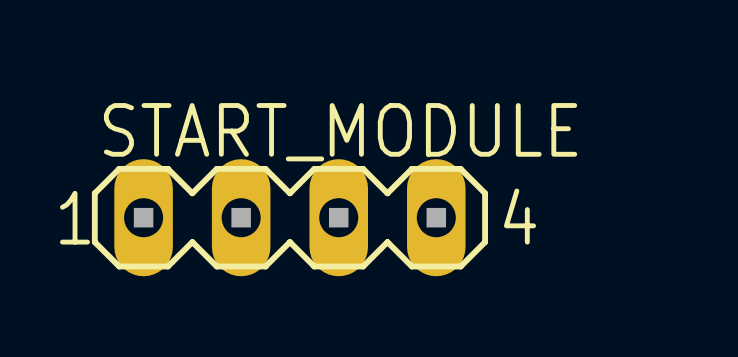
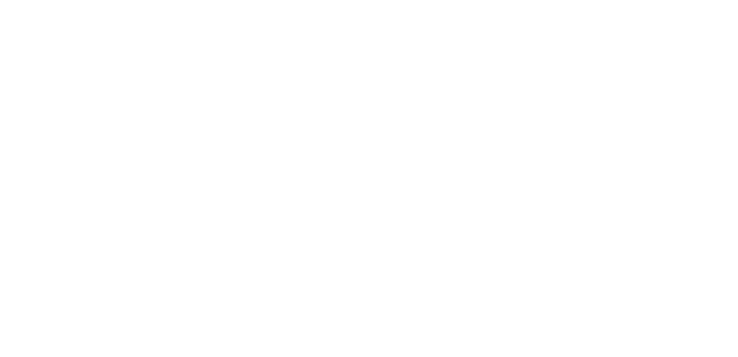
START_MODULE: (289, 217) -> none

